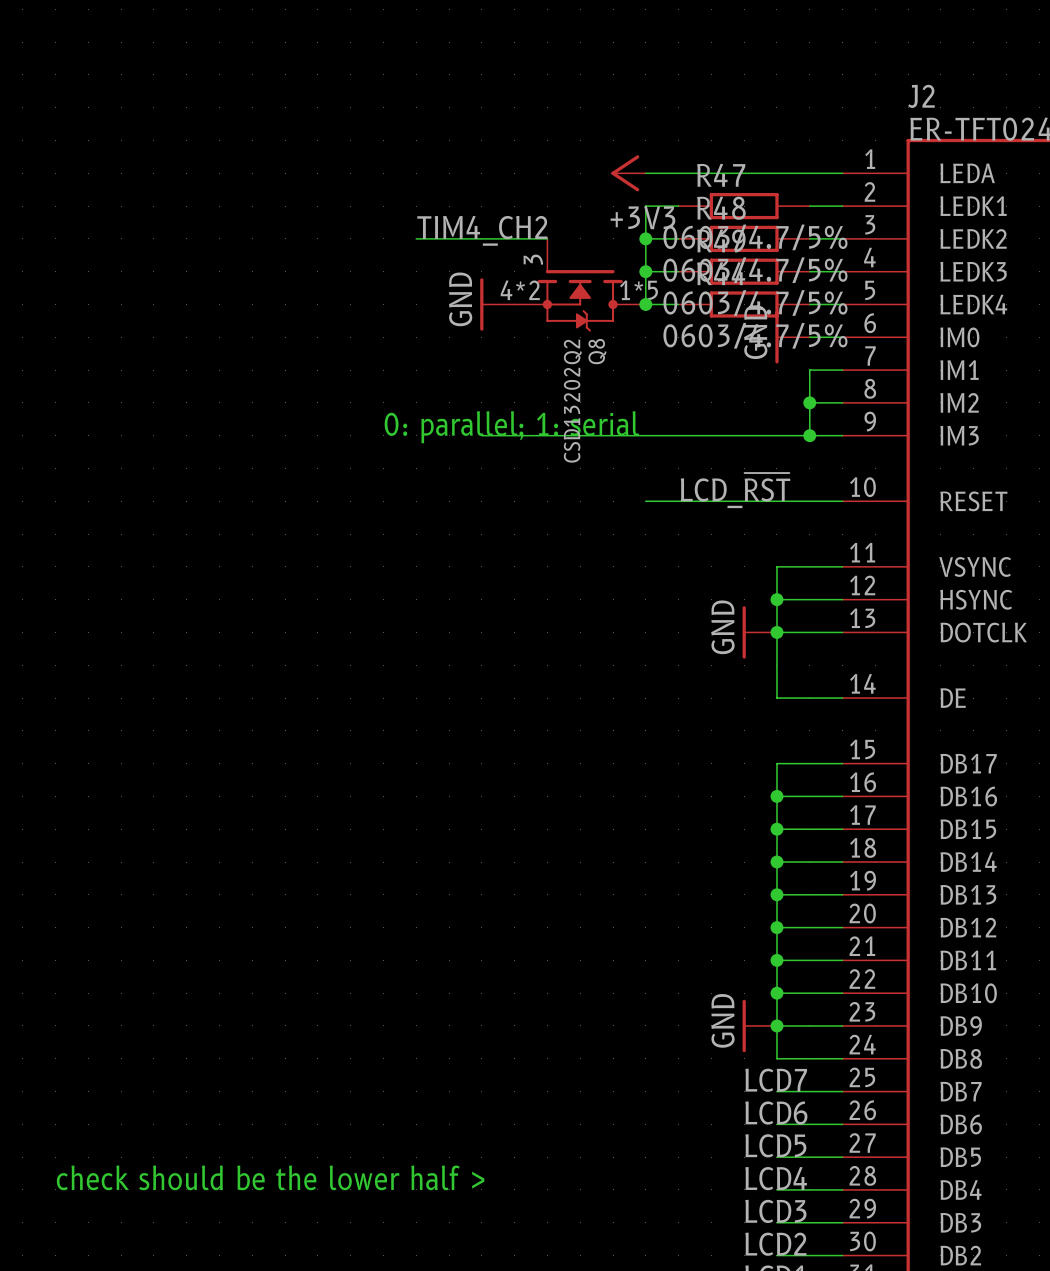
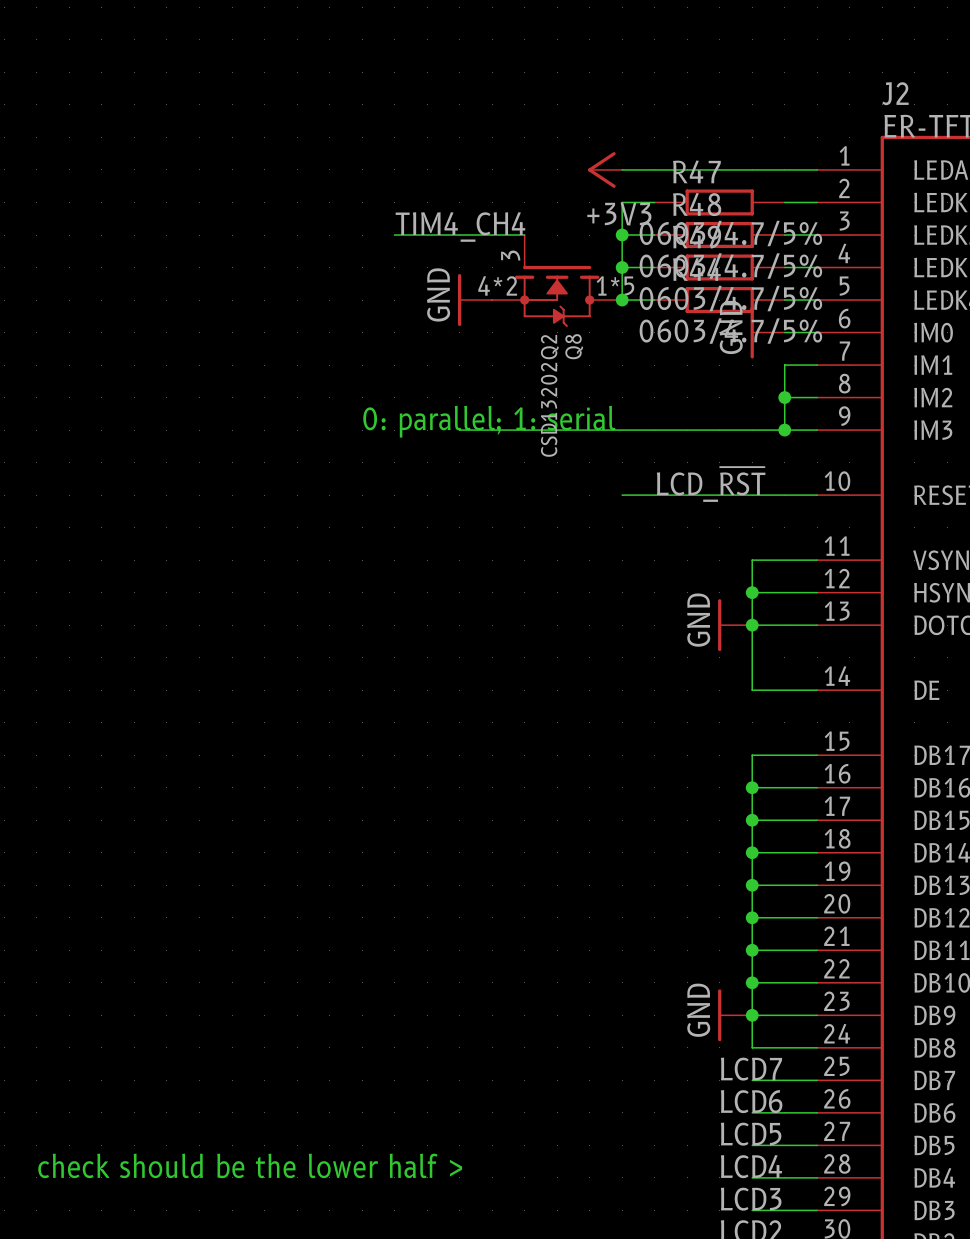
label: TIM4_CH2 (482, 230) -> TIM4_CH4 (460, 227)

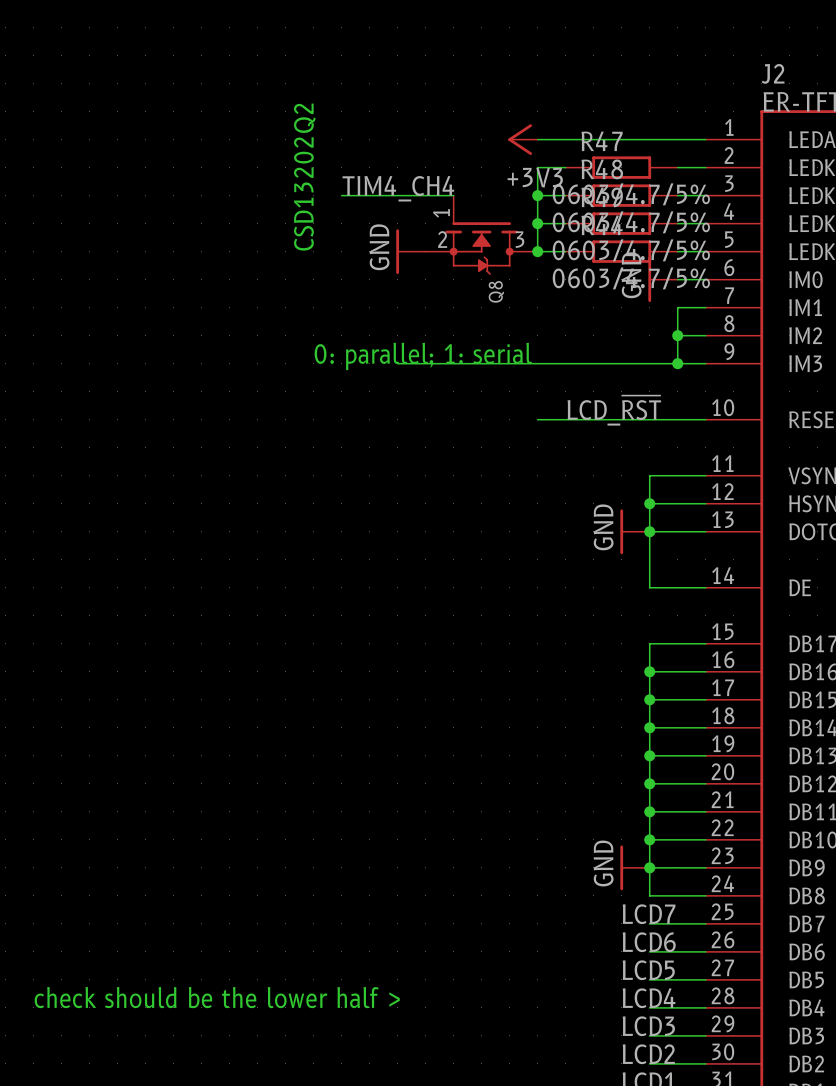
text: none -> CSD13202Q2 (304, 177)
Q8 pin number: 3 (510, 255) -> 1 (441, 213)
Q8 pin number: 4*2 (497, 285) -> 2 (442, 239)
Q8 pin number: 1*5 (615, 285) -> 3 (520, 239)
Q8 value: CSD13202Q2 (549, 395) -> none

